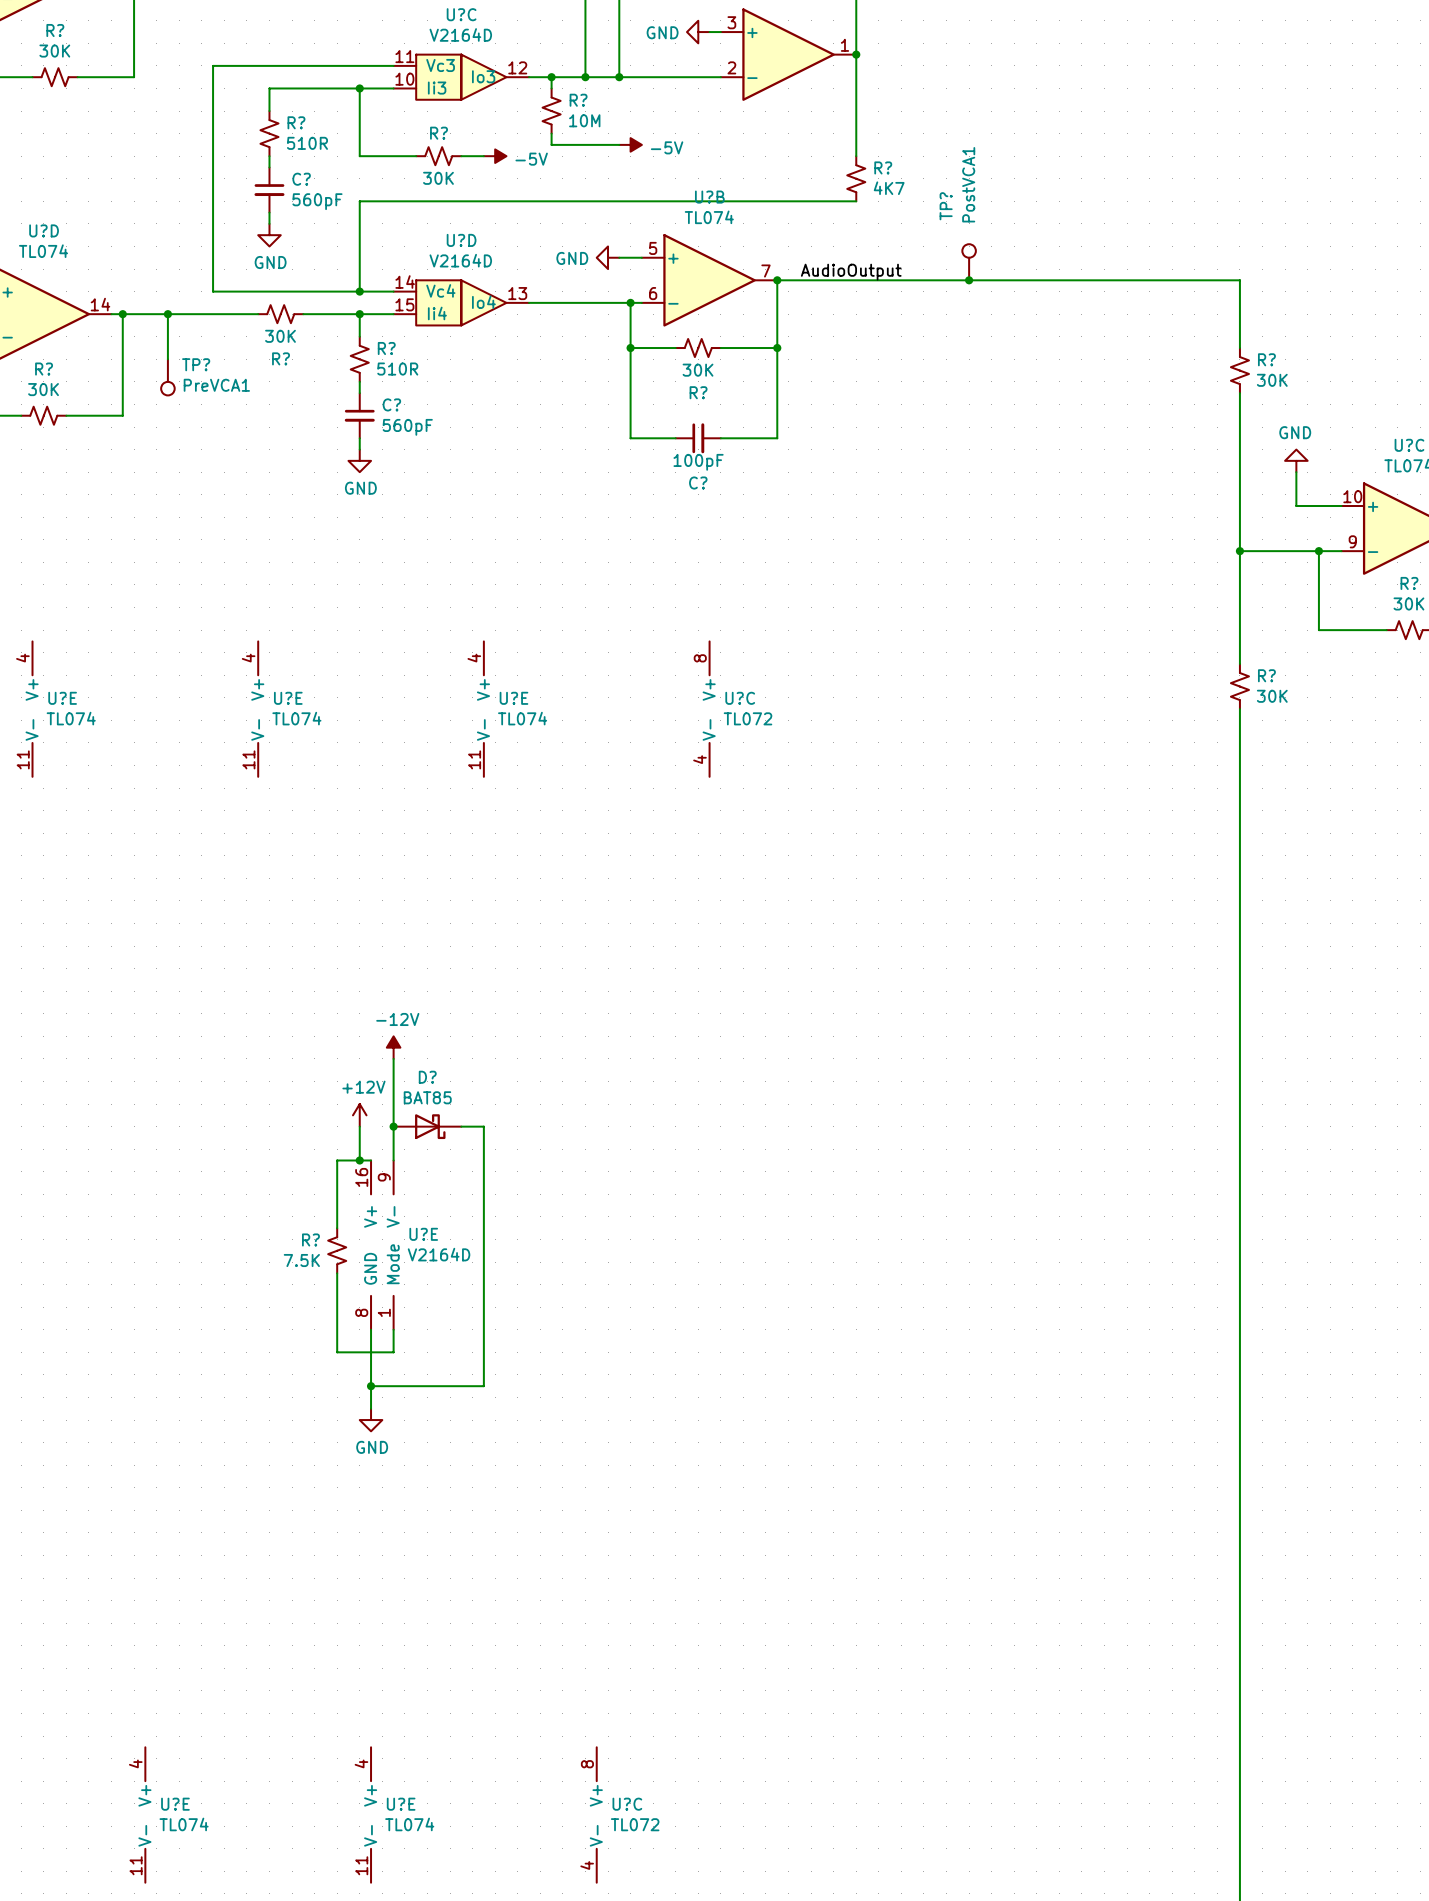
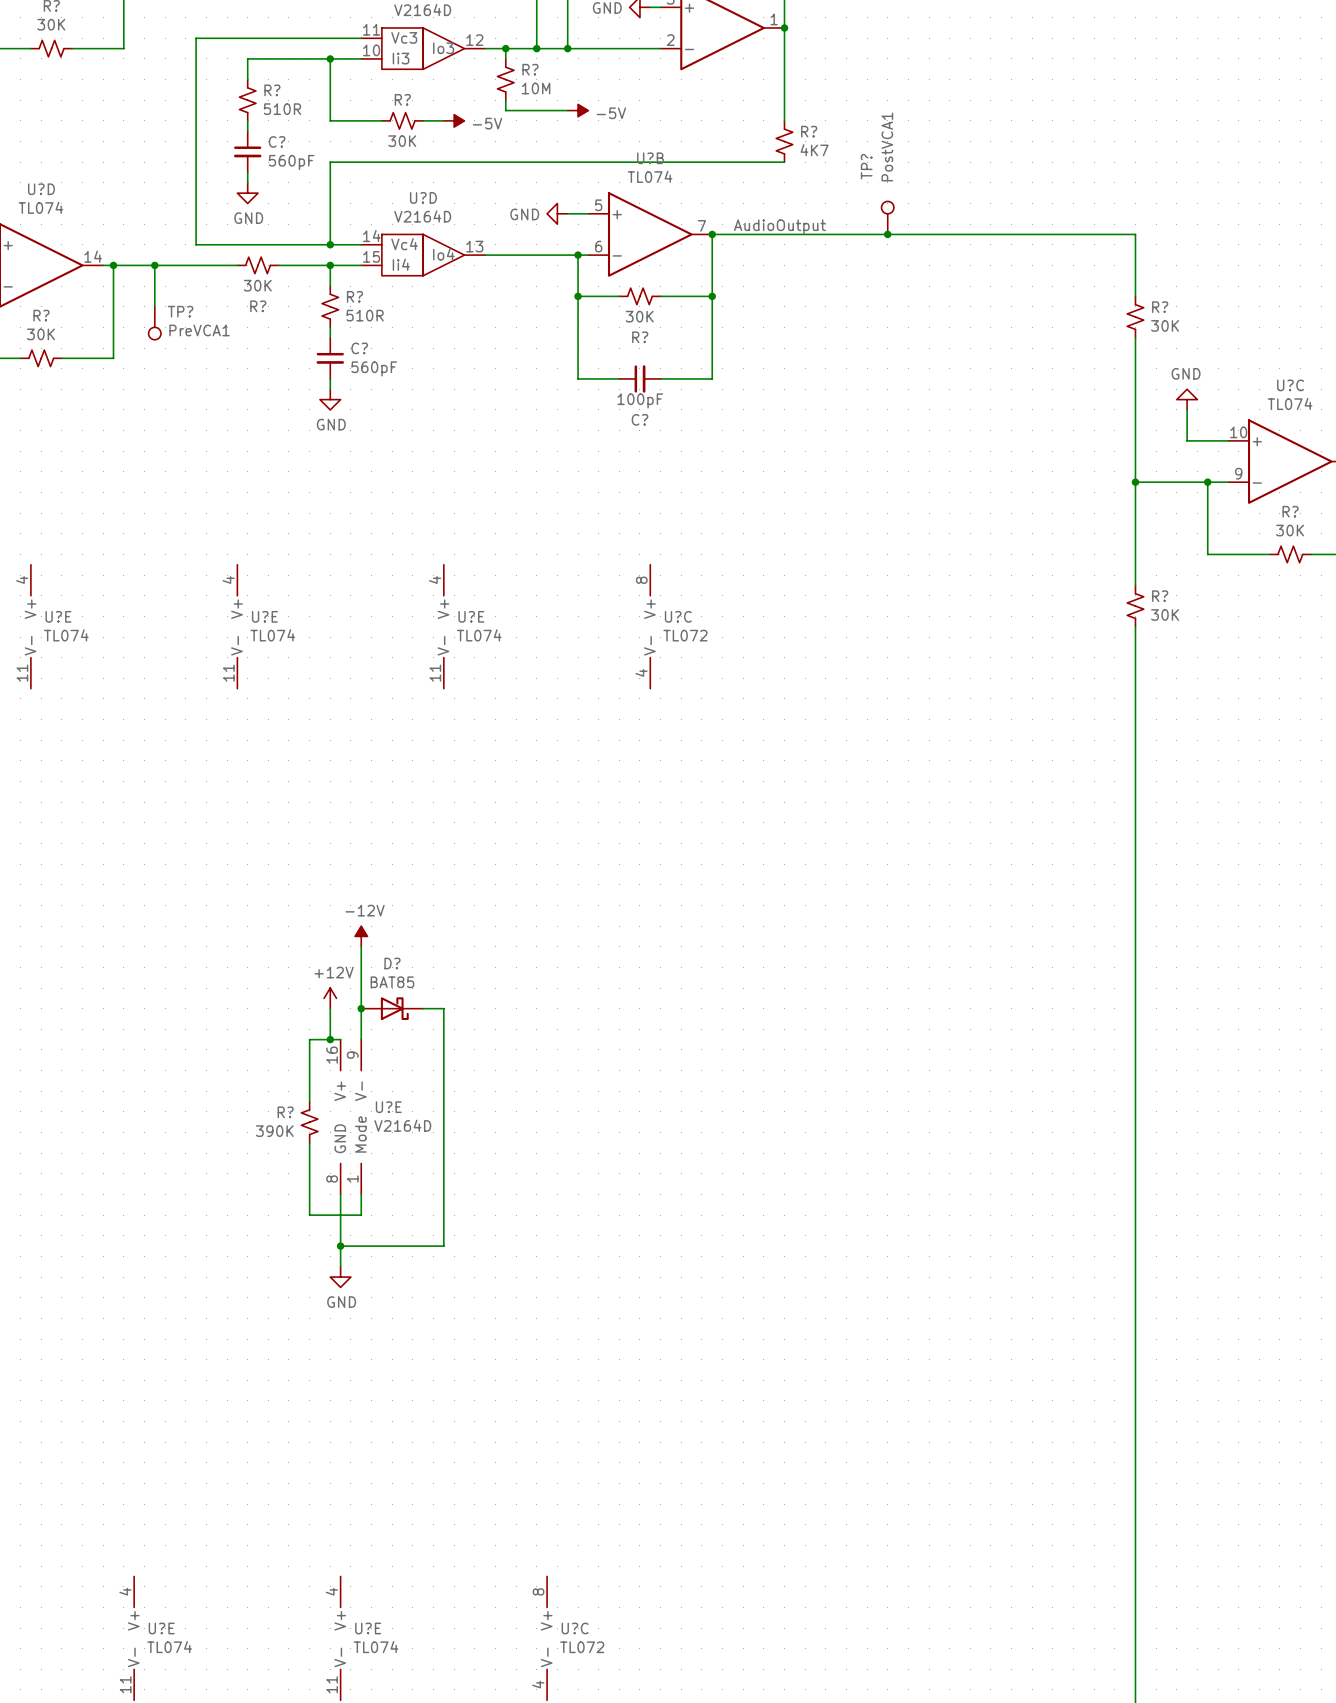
R? value: 7.5K (301, 1260) -> 390K (274, 1131)

